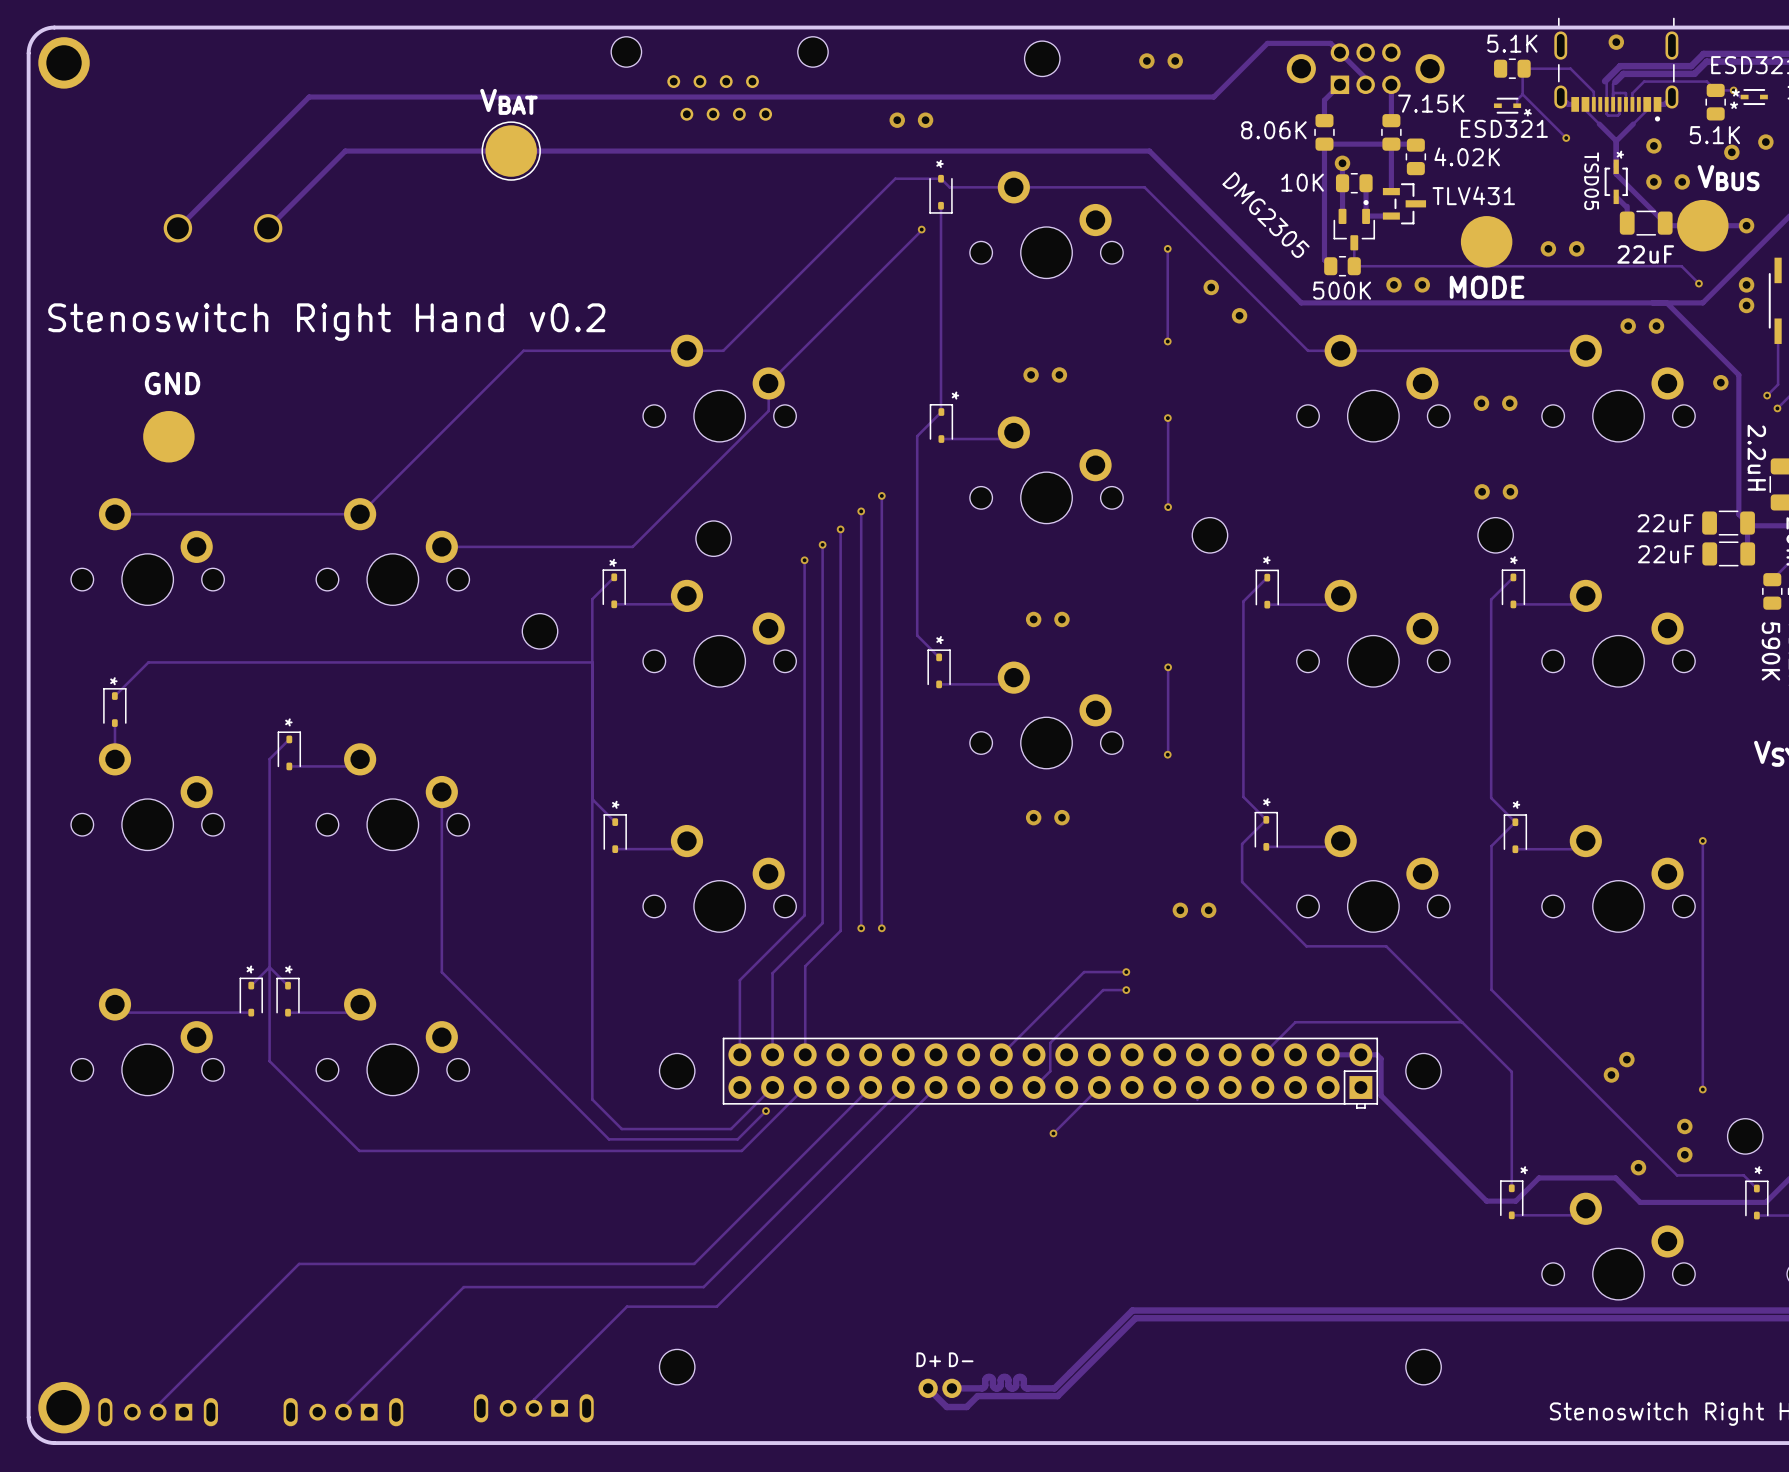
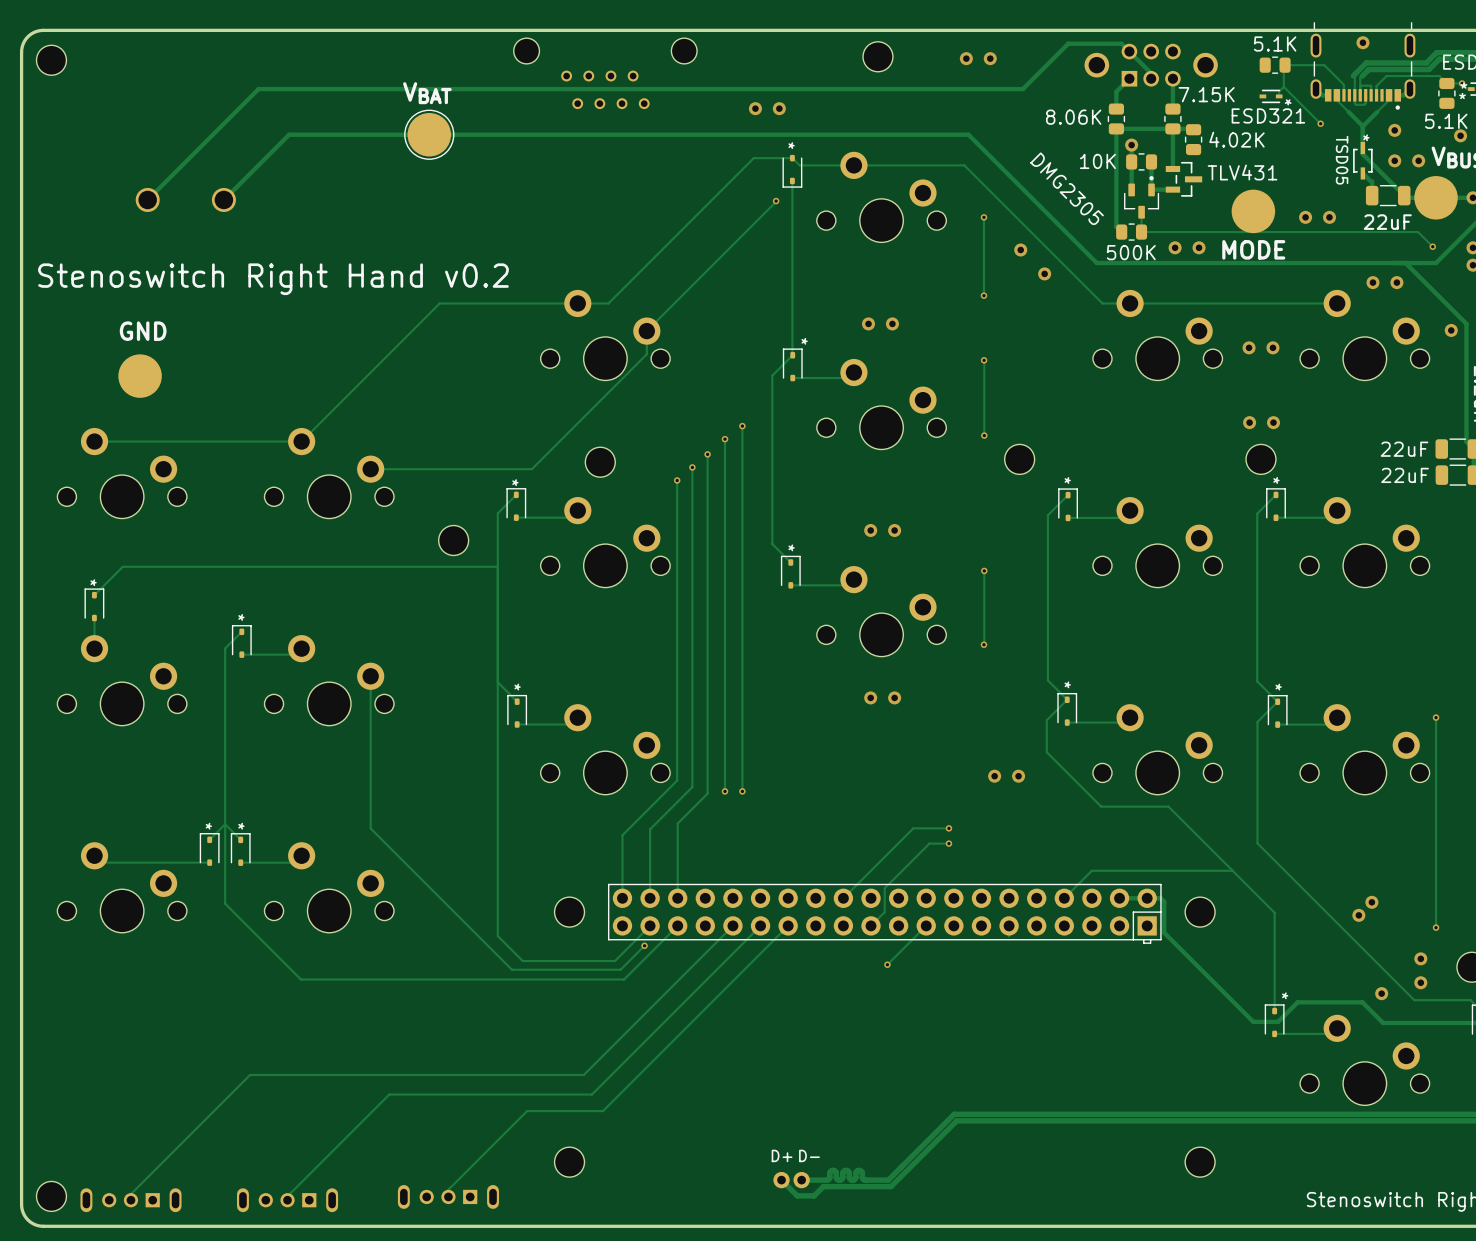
part footprint: [38, 37, 90, 89] -> [36, 45, 67, 76]
part footprint: [38, 1381, 90, 1434] -> [36, 1181, 67, 1212]

